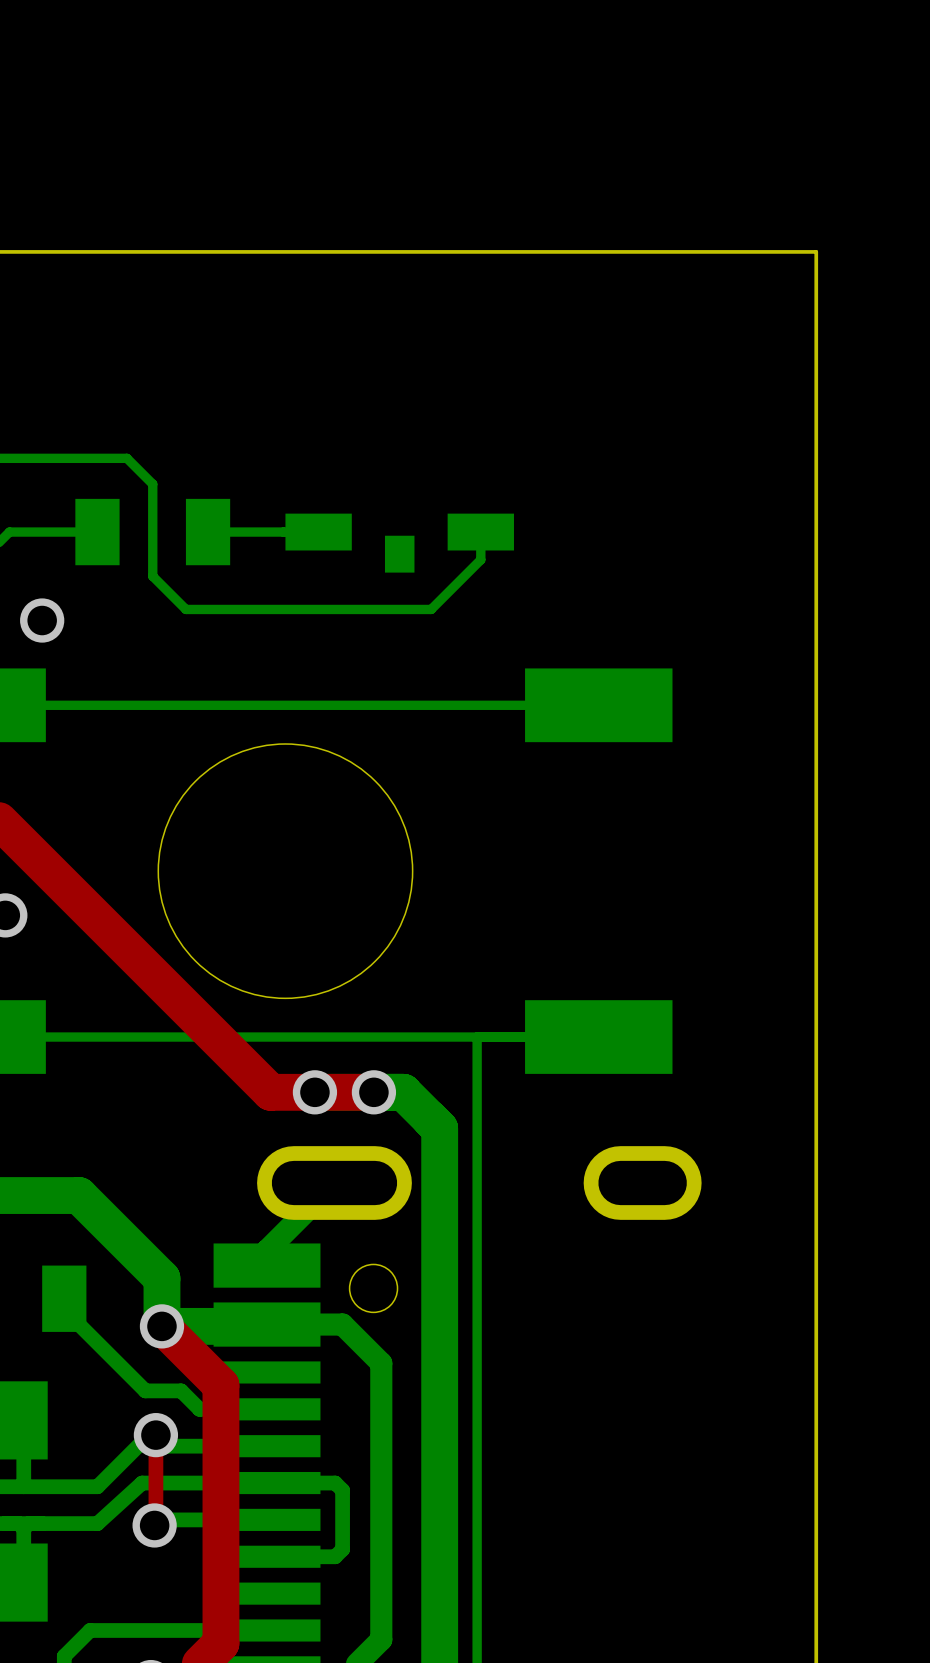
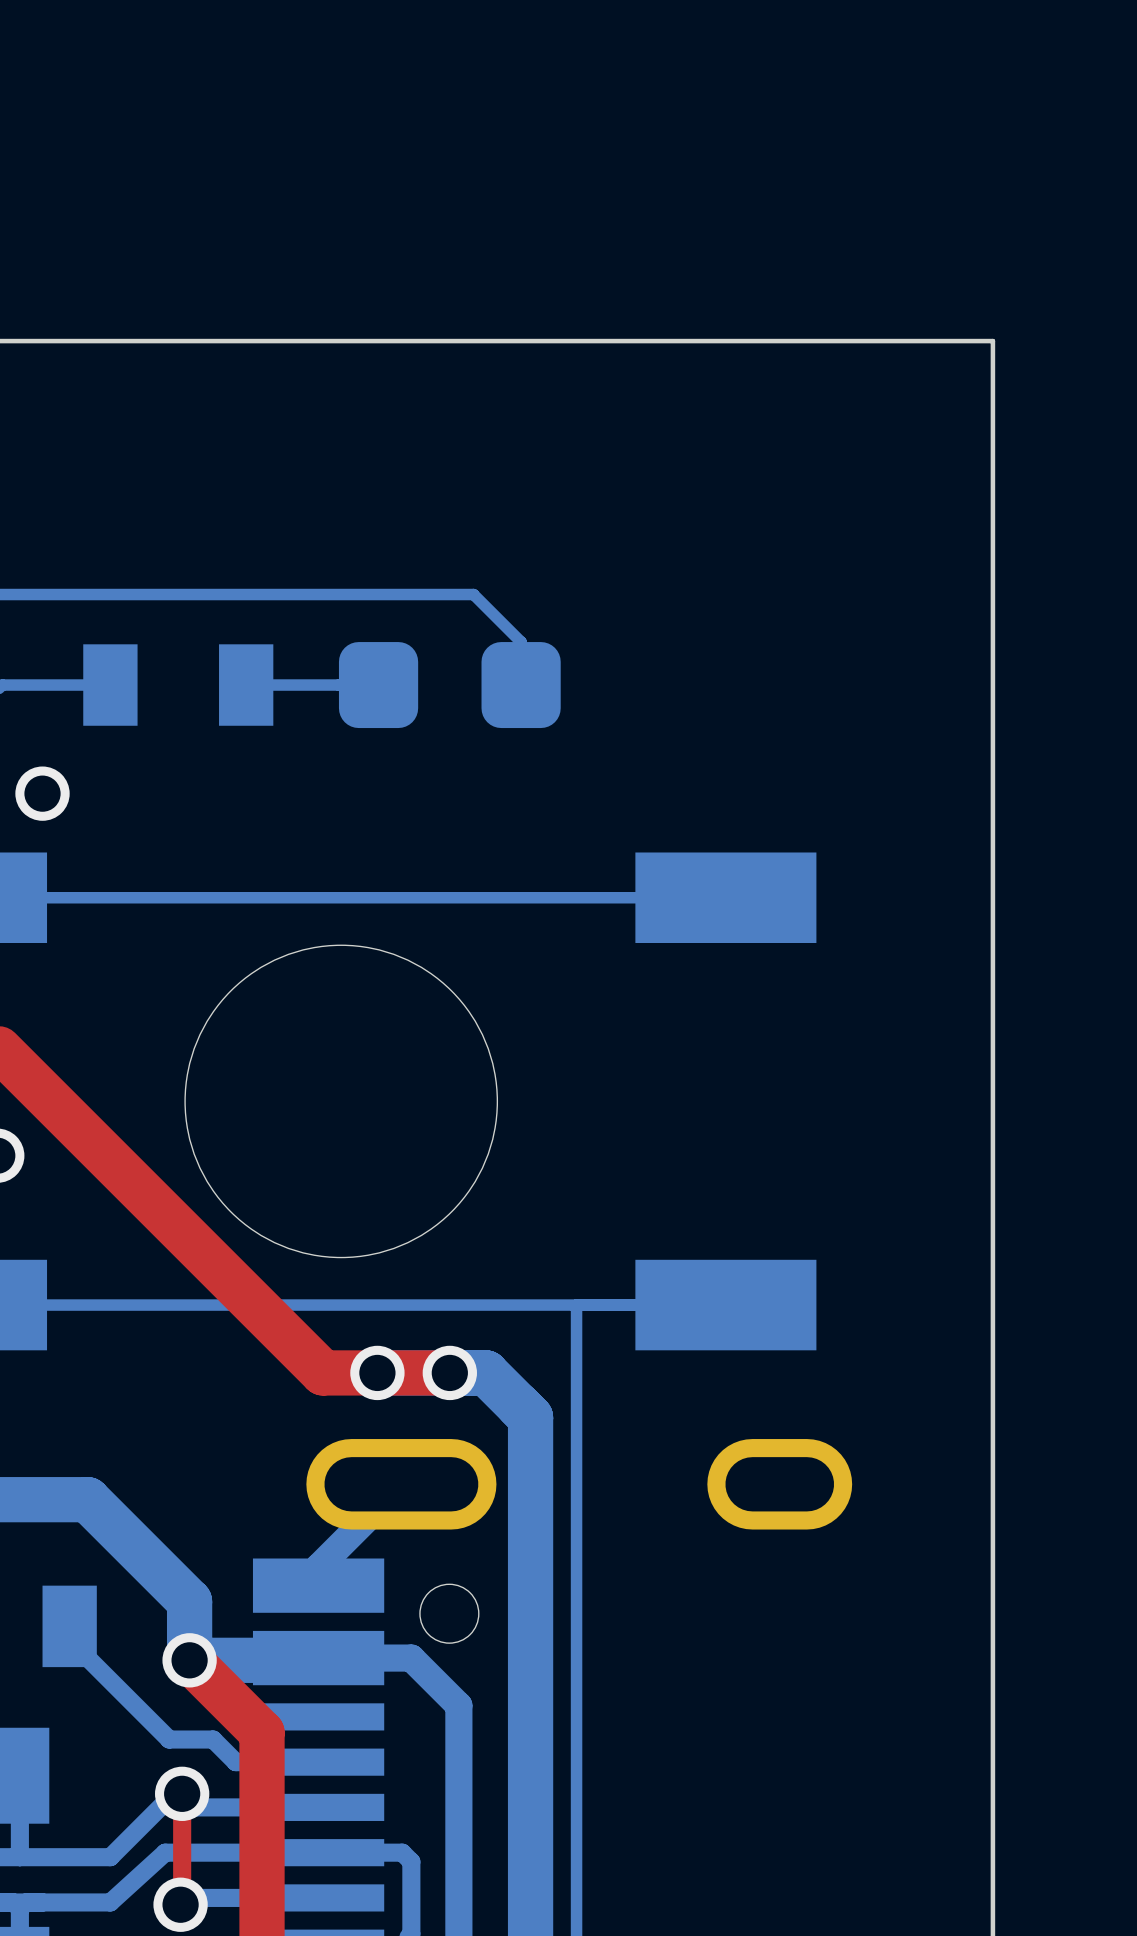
bottom track: (126, 458) (152, 484) (152, 576) (185, 609) (431, 609) (480, 559) (480, 532) -> (146, 594) (473, 594) (521, 642) (521, 685)
part footprint: [285, 513, 514, 573] -> [338, 642, 561, 729]

